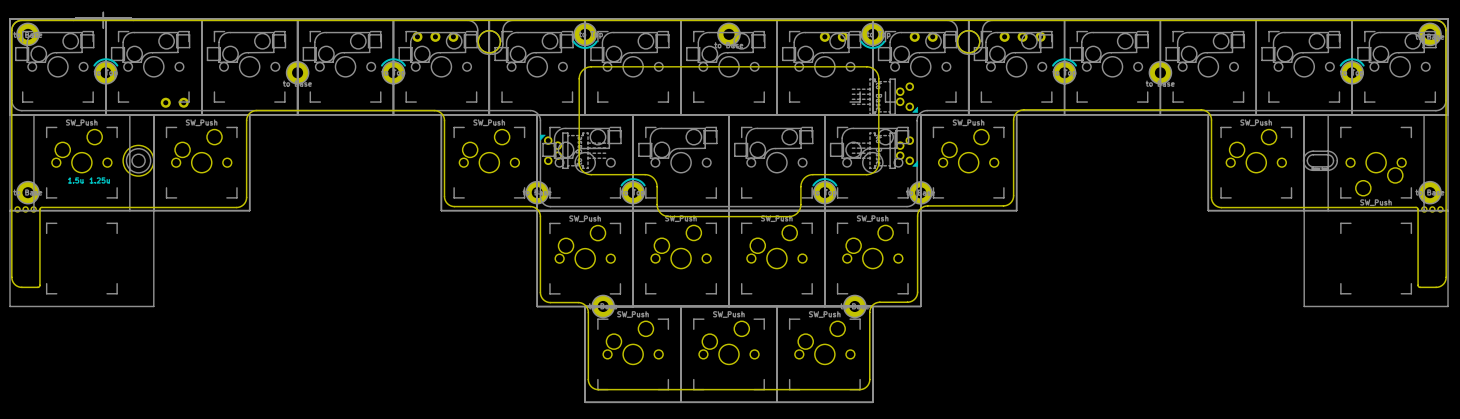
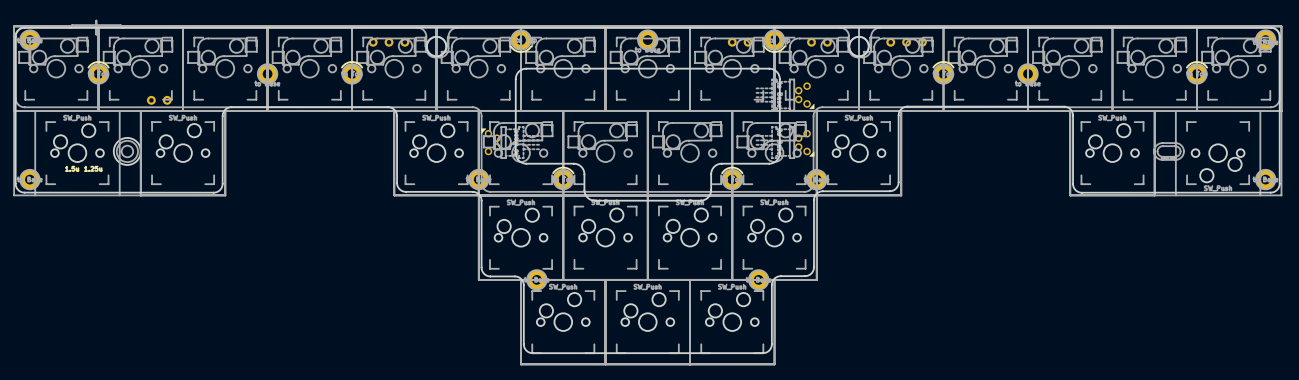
part footprint: [9, 11, 1449, 403] -> [13, 20, 1282, 365]

